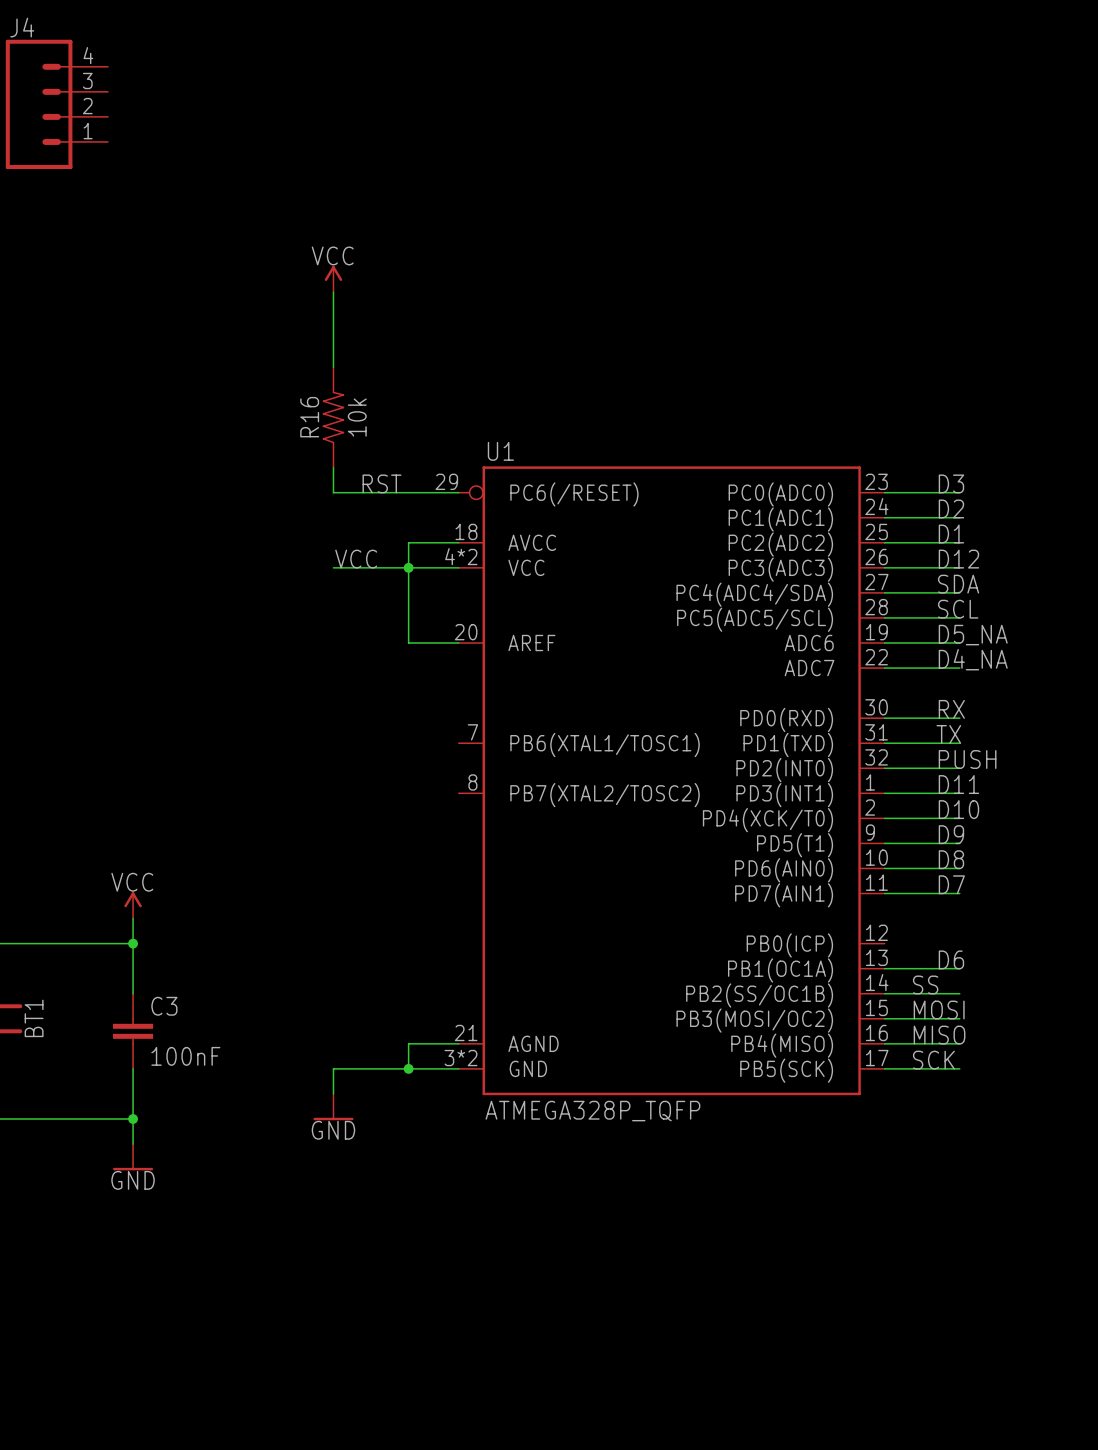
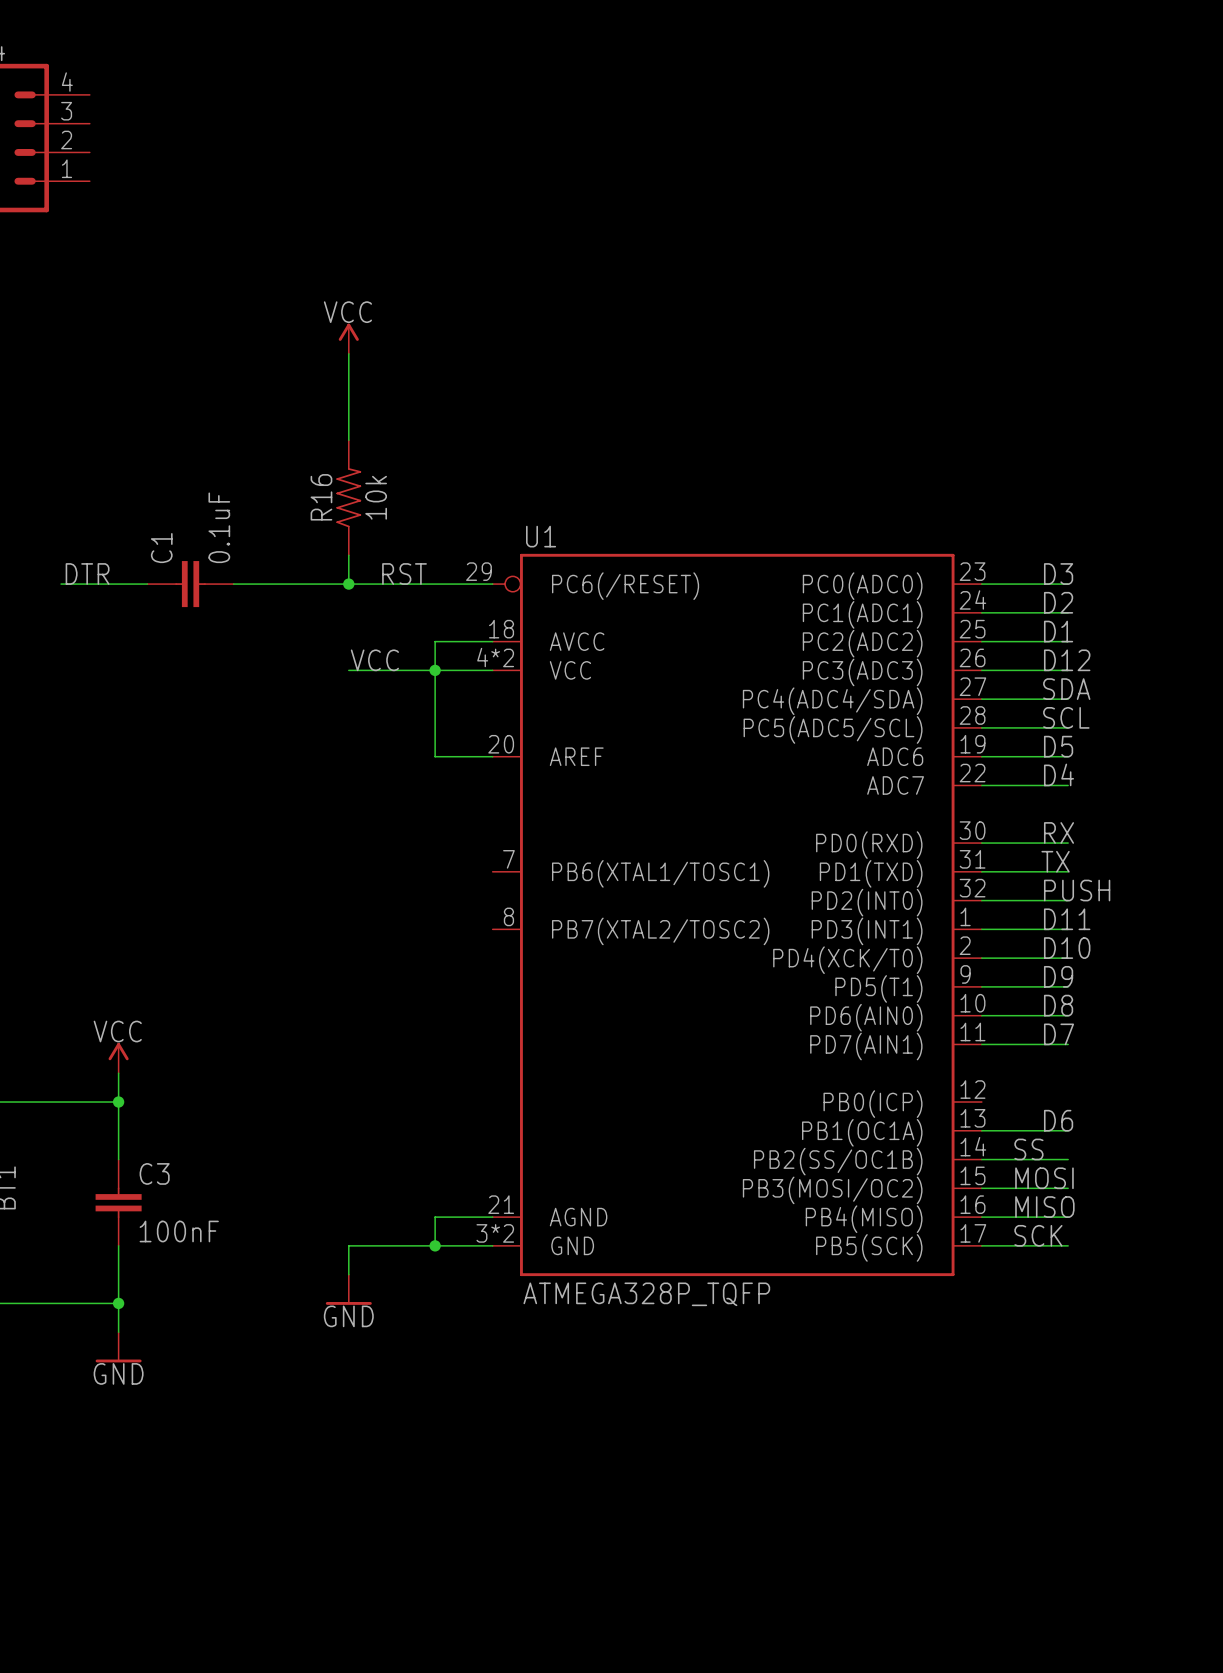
label: none -> DTR (87, 574)
wire: none -> (61, 584) (147, 584)
C1: none -> 0.1uF (190, 584)
wire: none -> (233, 584) (348, 584)
junction: none -> (348, 584)
label: D5_NA (973, 635) -> D5 (1058, 746)
label: D4_NA (973, 659) -> D4 (1059, 774)

